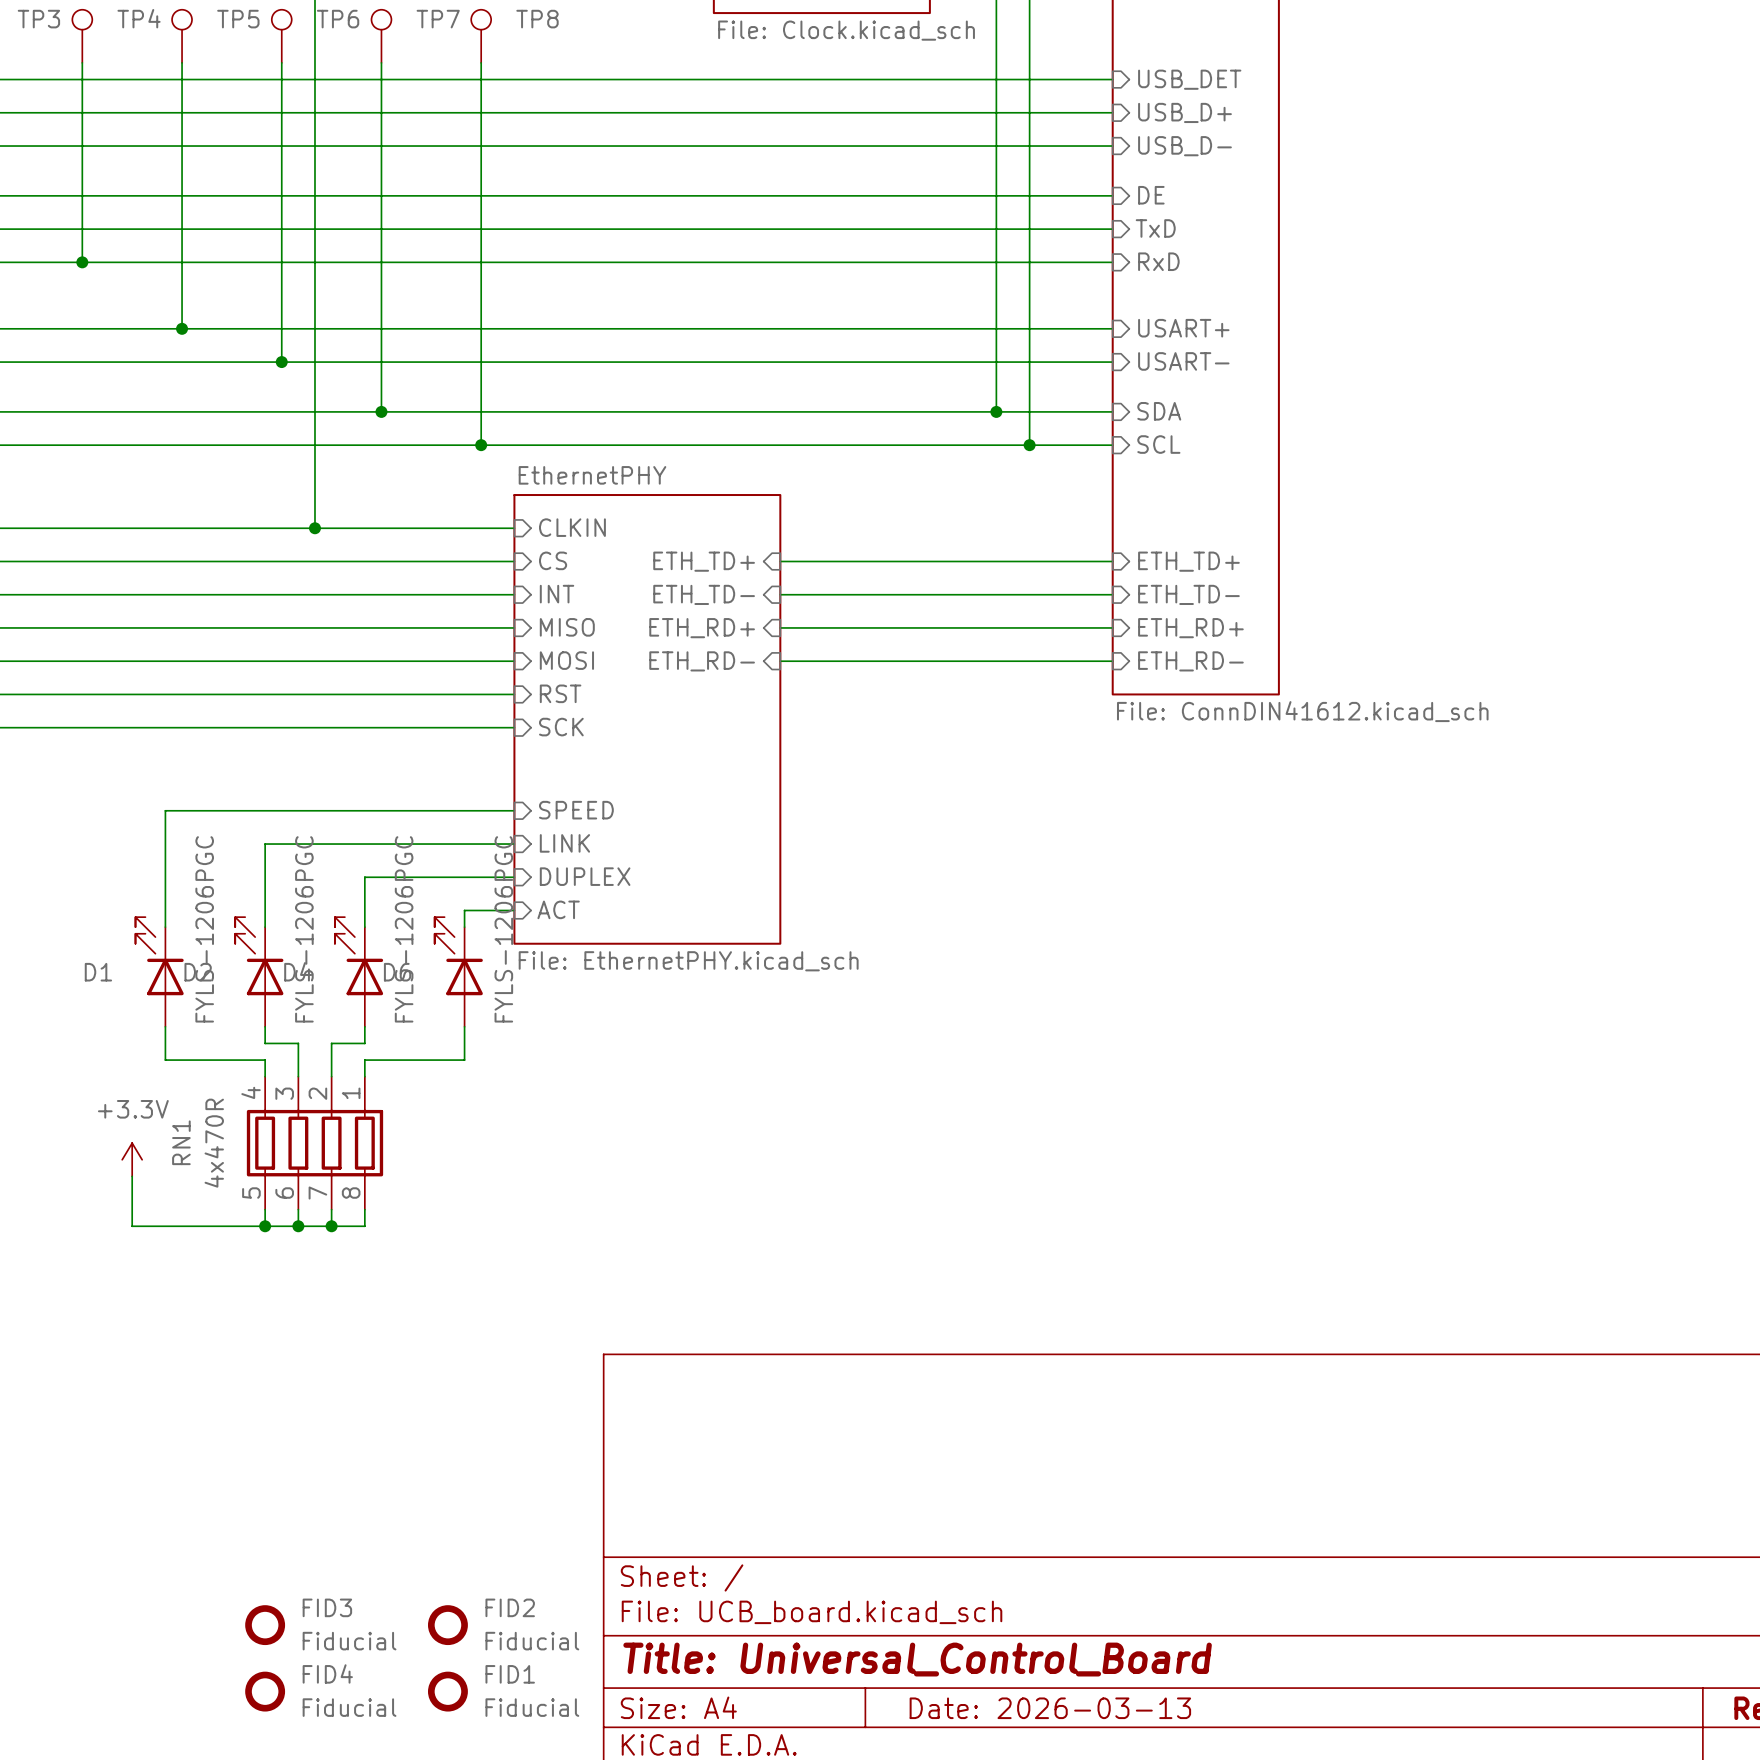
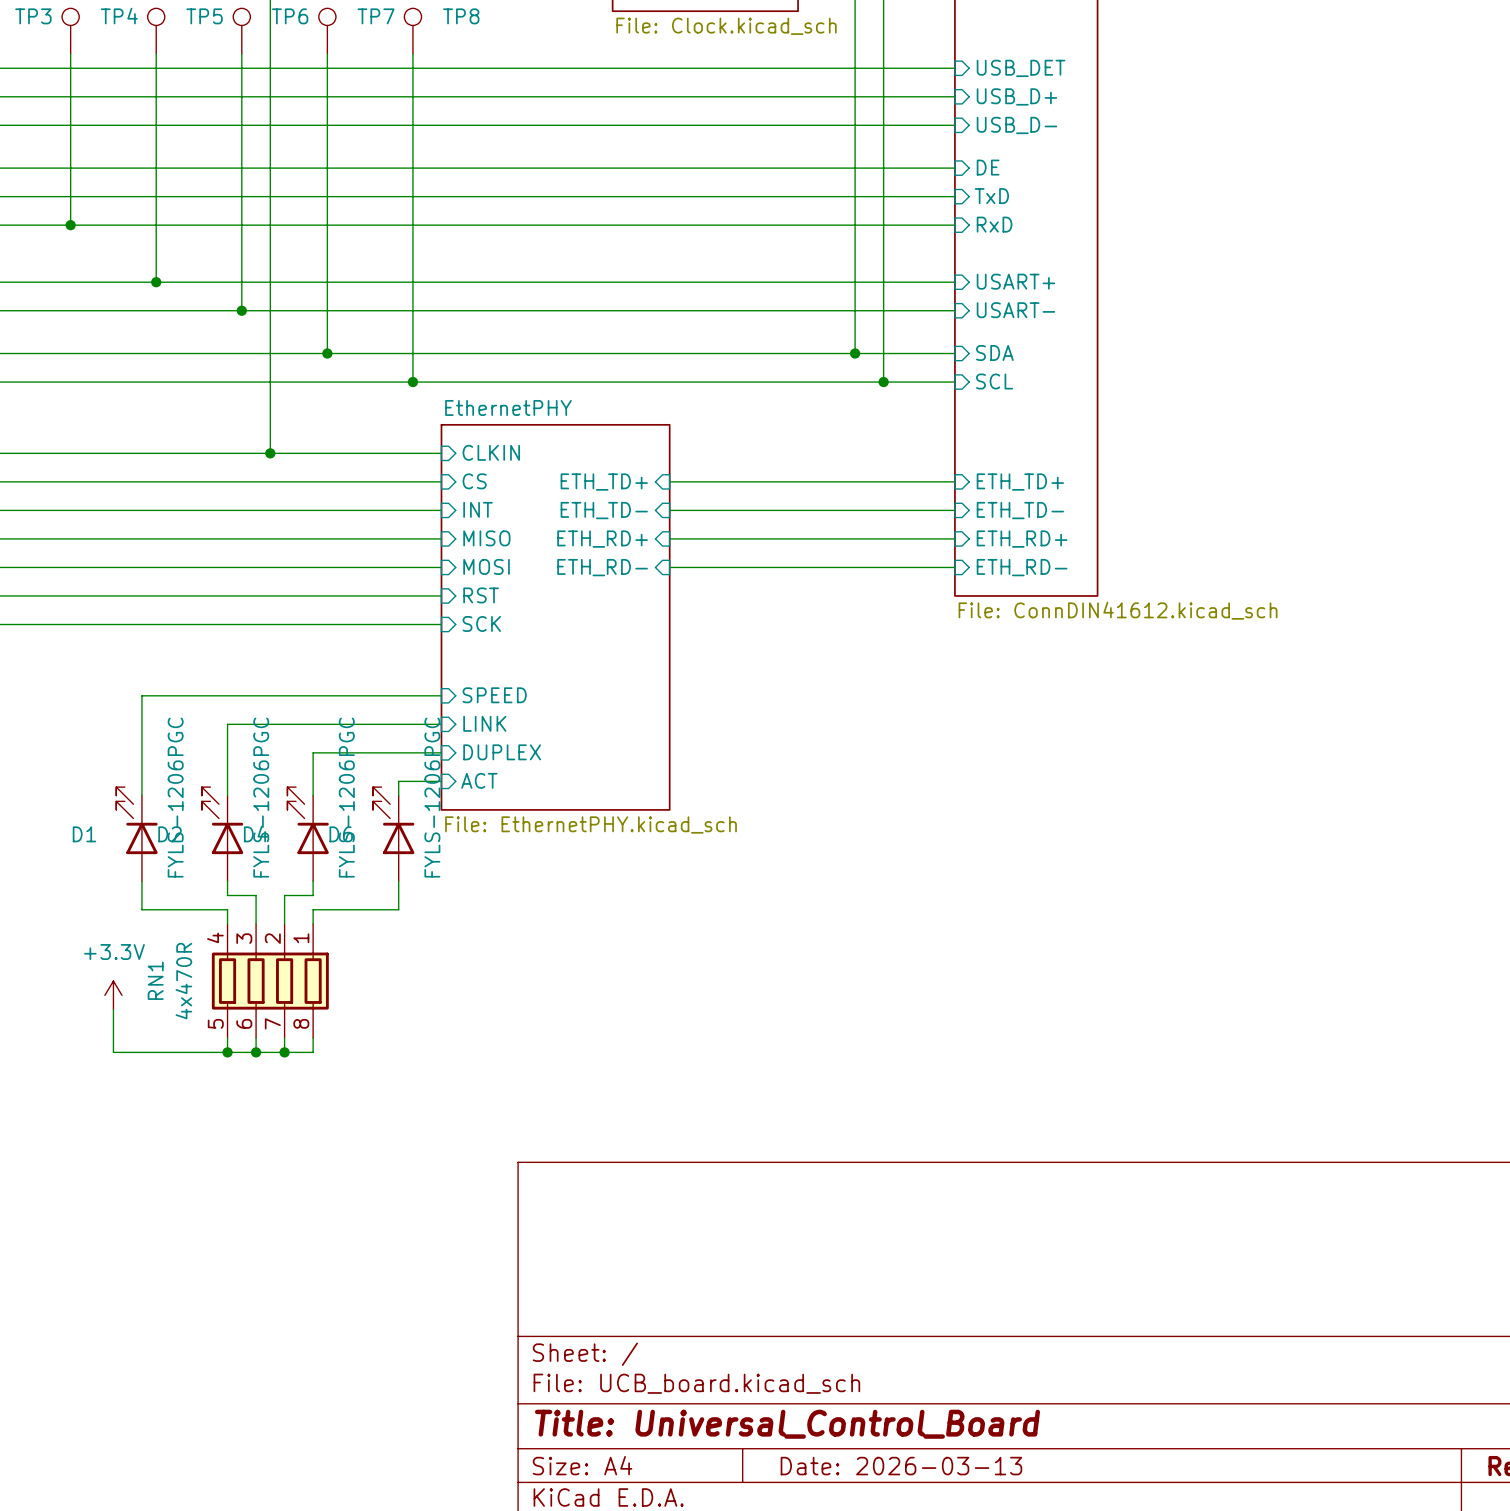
FID3: Fiducial (265, 1625) -> none
FID2: Fiducial (447, 1625) -> none
FID4: Fiducial (265, 1691) -> none
FID1: Fiducial (447, 1691) -> none

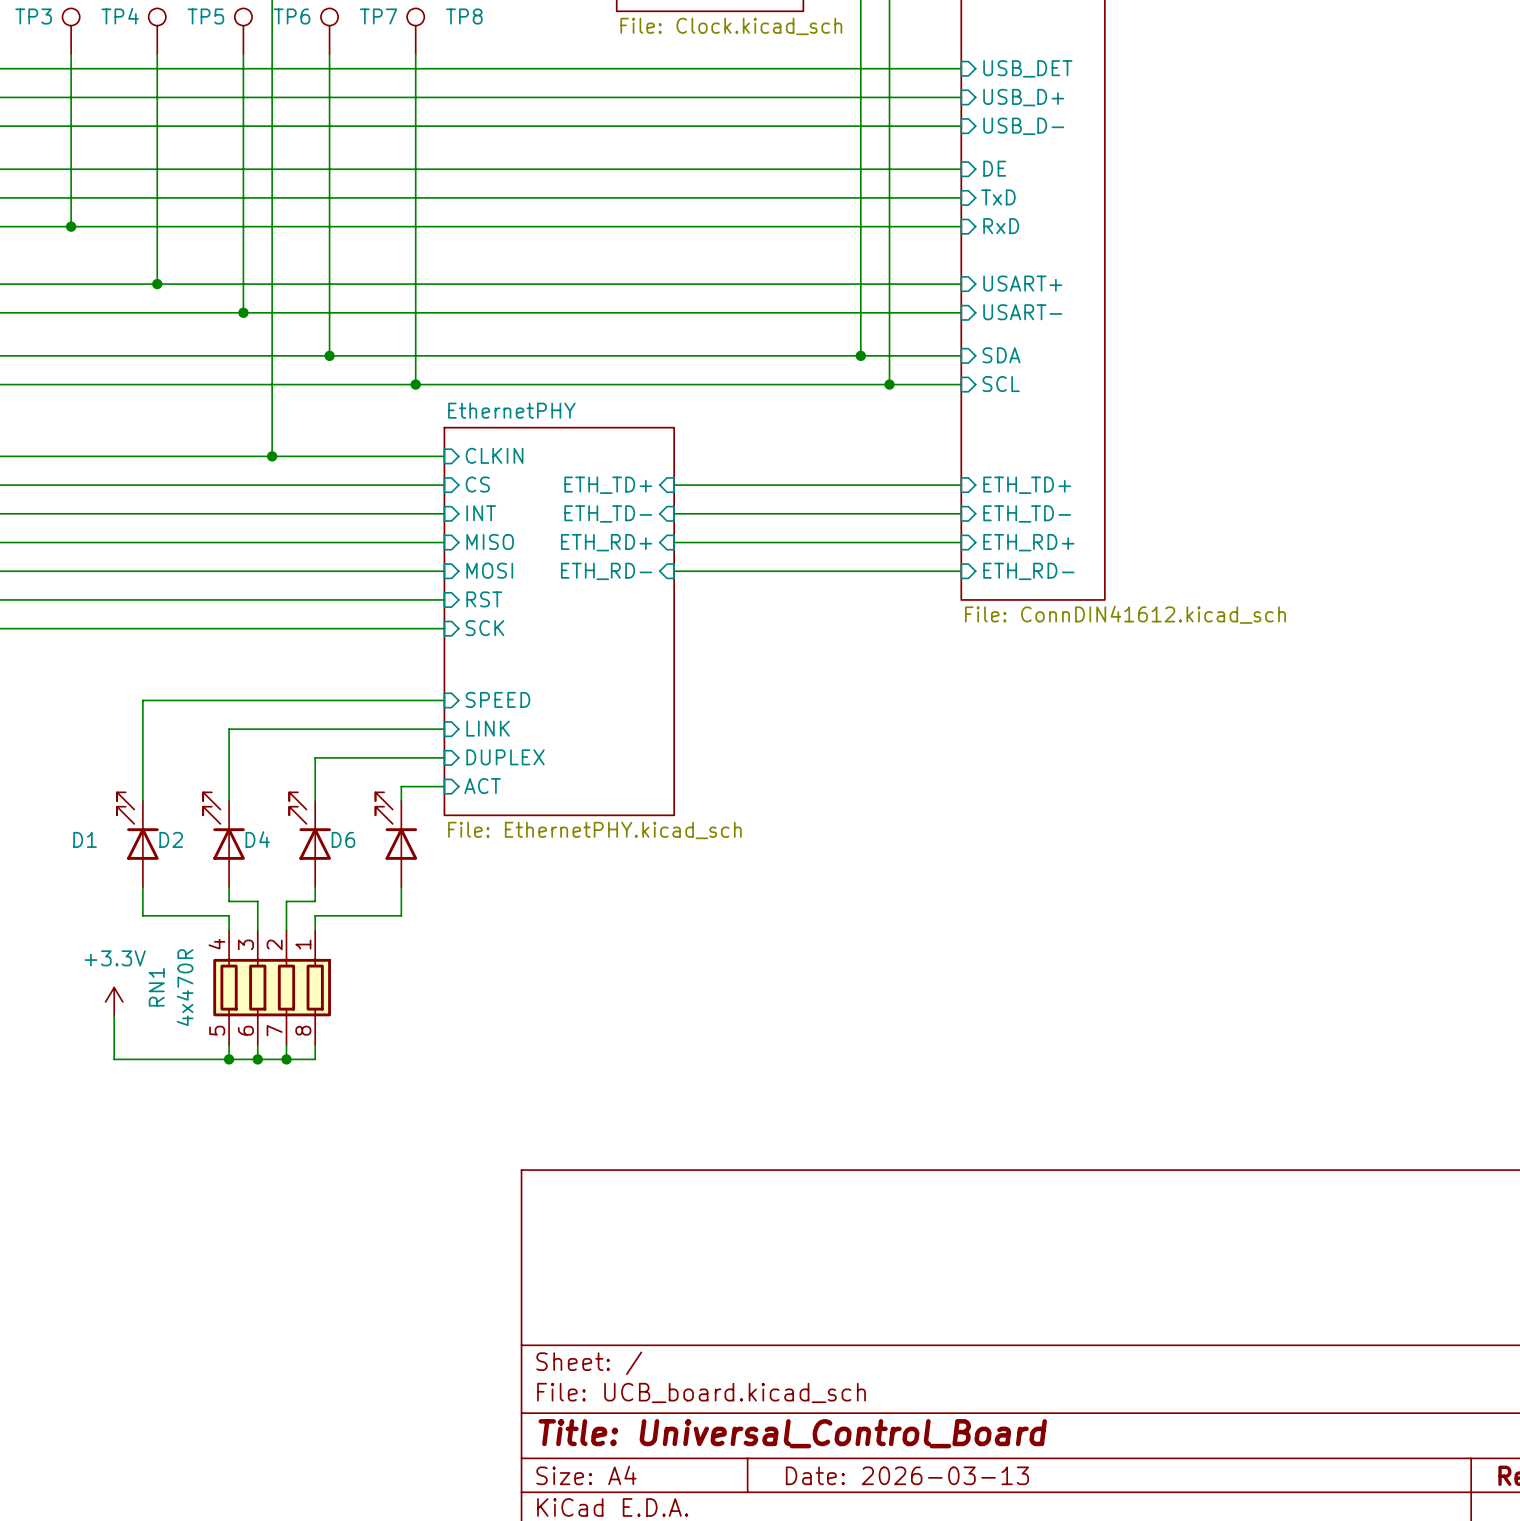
D1 value: FYLS-1206PGC (175, 797) -> none
D2 value: FYLS-1206PGC (261, 797) -> none
D4 value: FYLS-1206PGC (346, 797) -> none
D6 value: FYLS-1206PGC (432, 797) -> none

